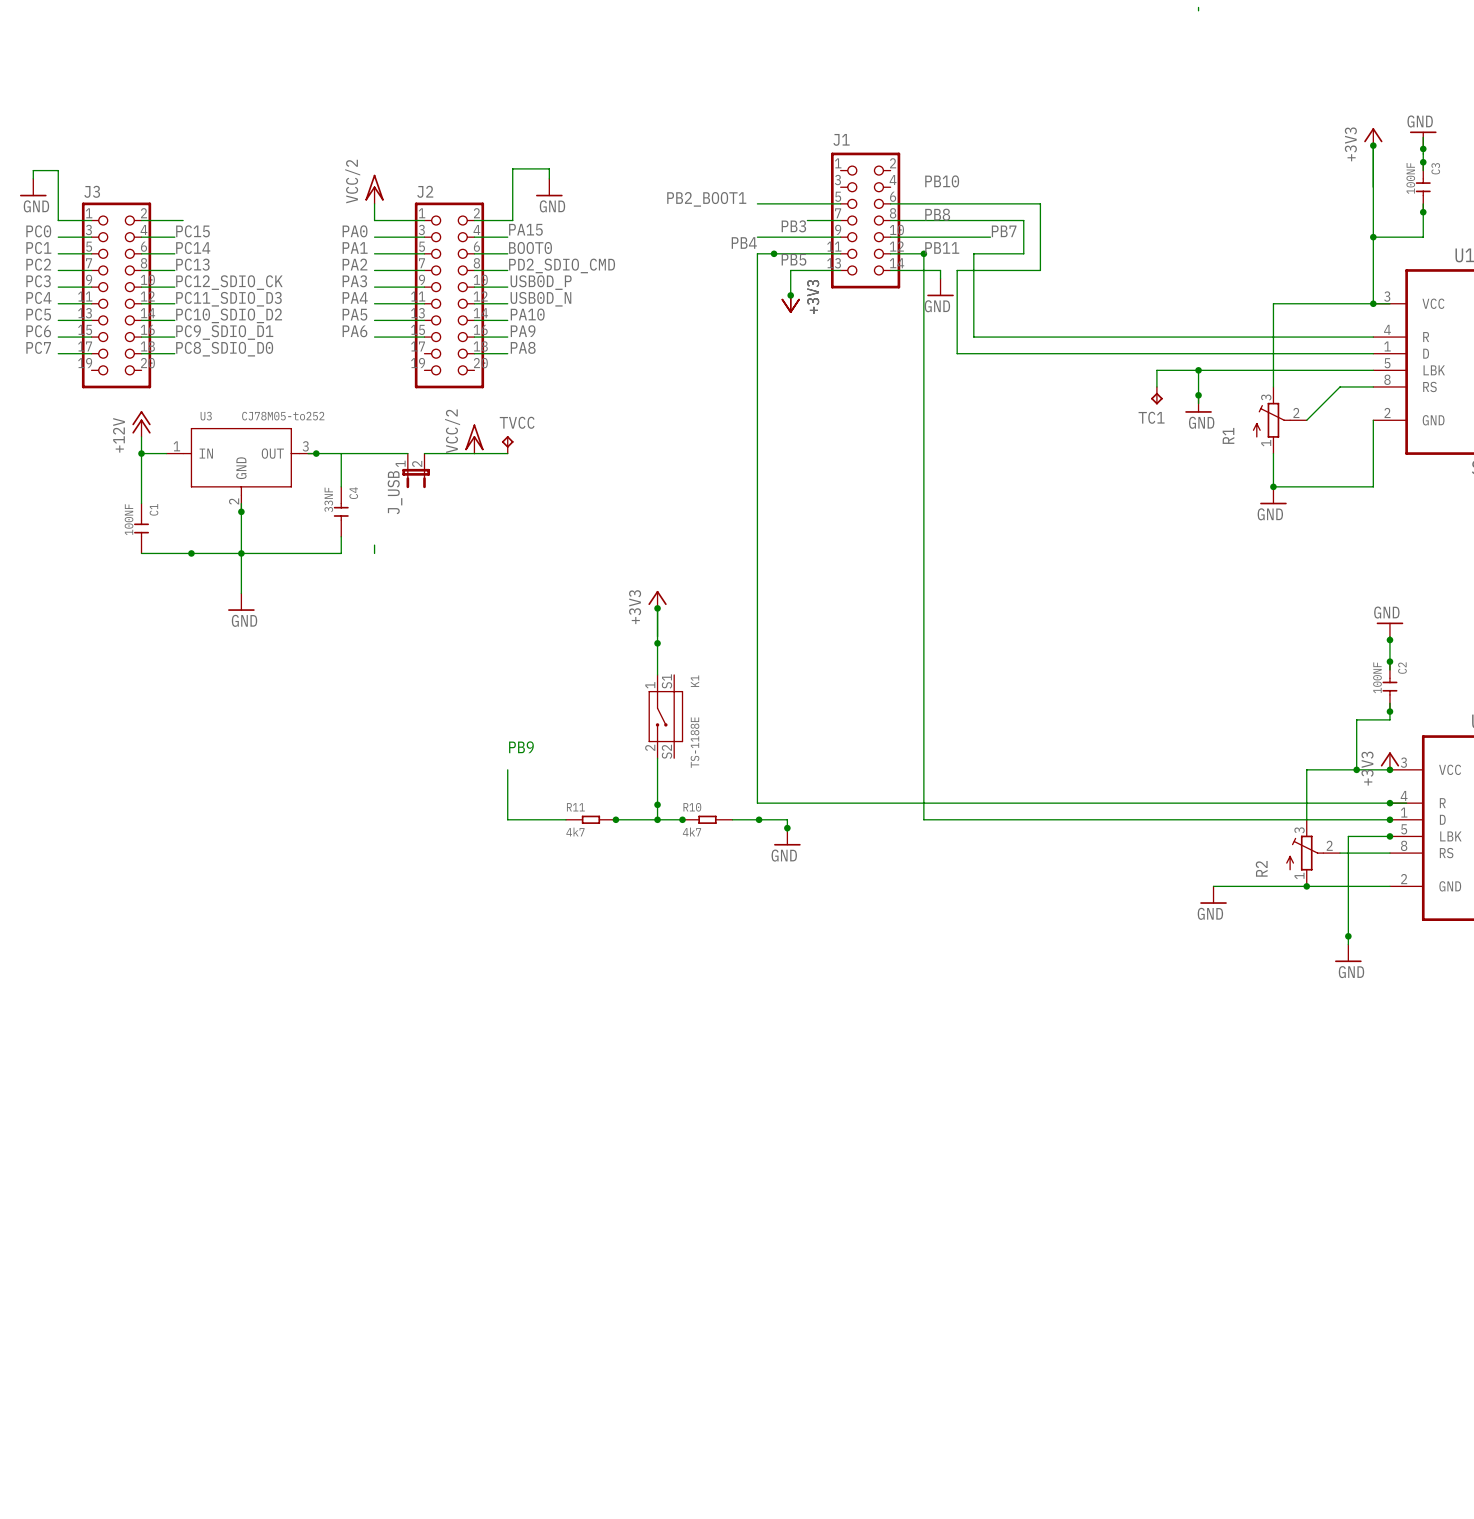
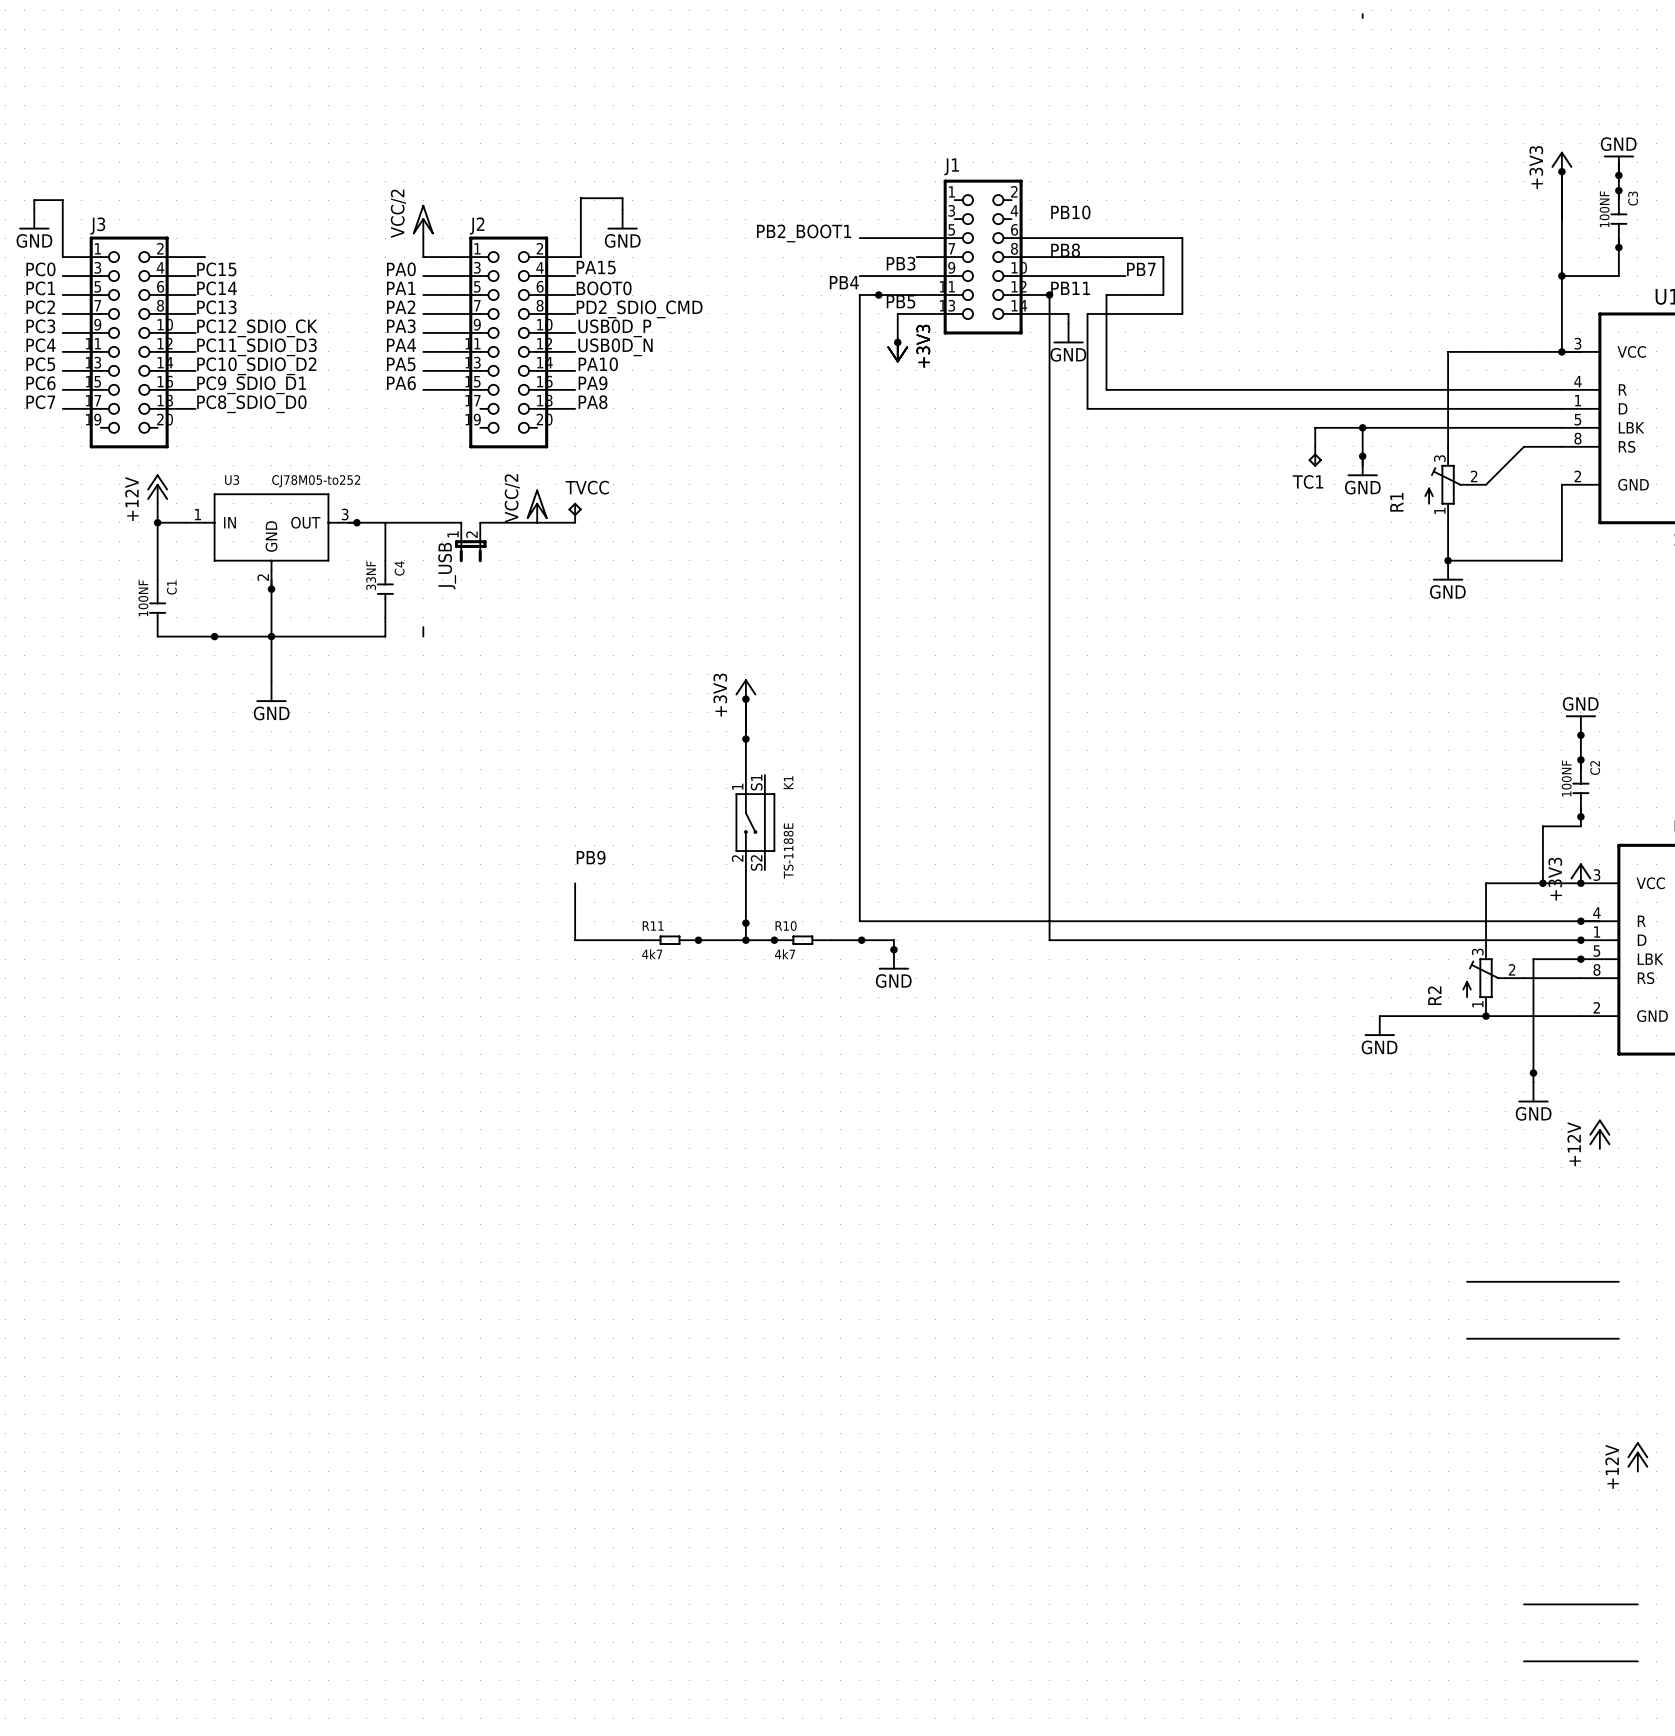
power symbol: none -> +12V (1599, 1134)
wire: none -> (1467, 1281) (1618, 1281)
wire: none -> (1467, 1338) (1618, 1338)
power symbol: none -> +12V (1637, 1456)
wire: none -> (1523, 1604) (1637, 1604)
wire: none -> (1523, 1661) (1637, 1661)

